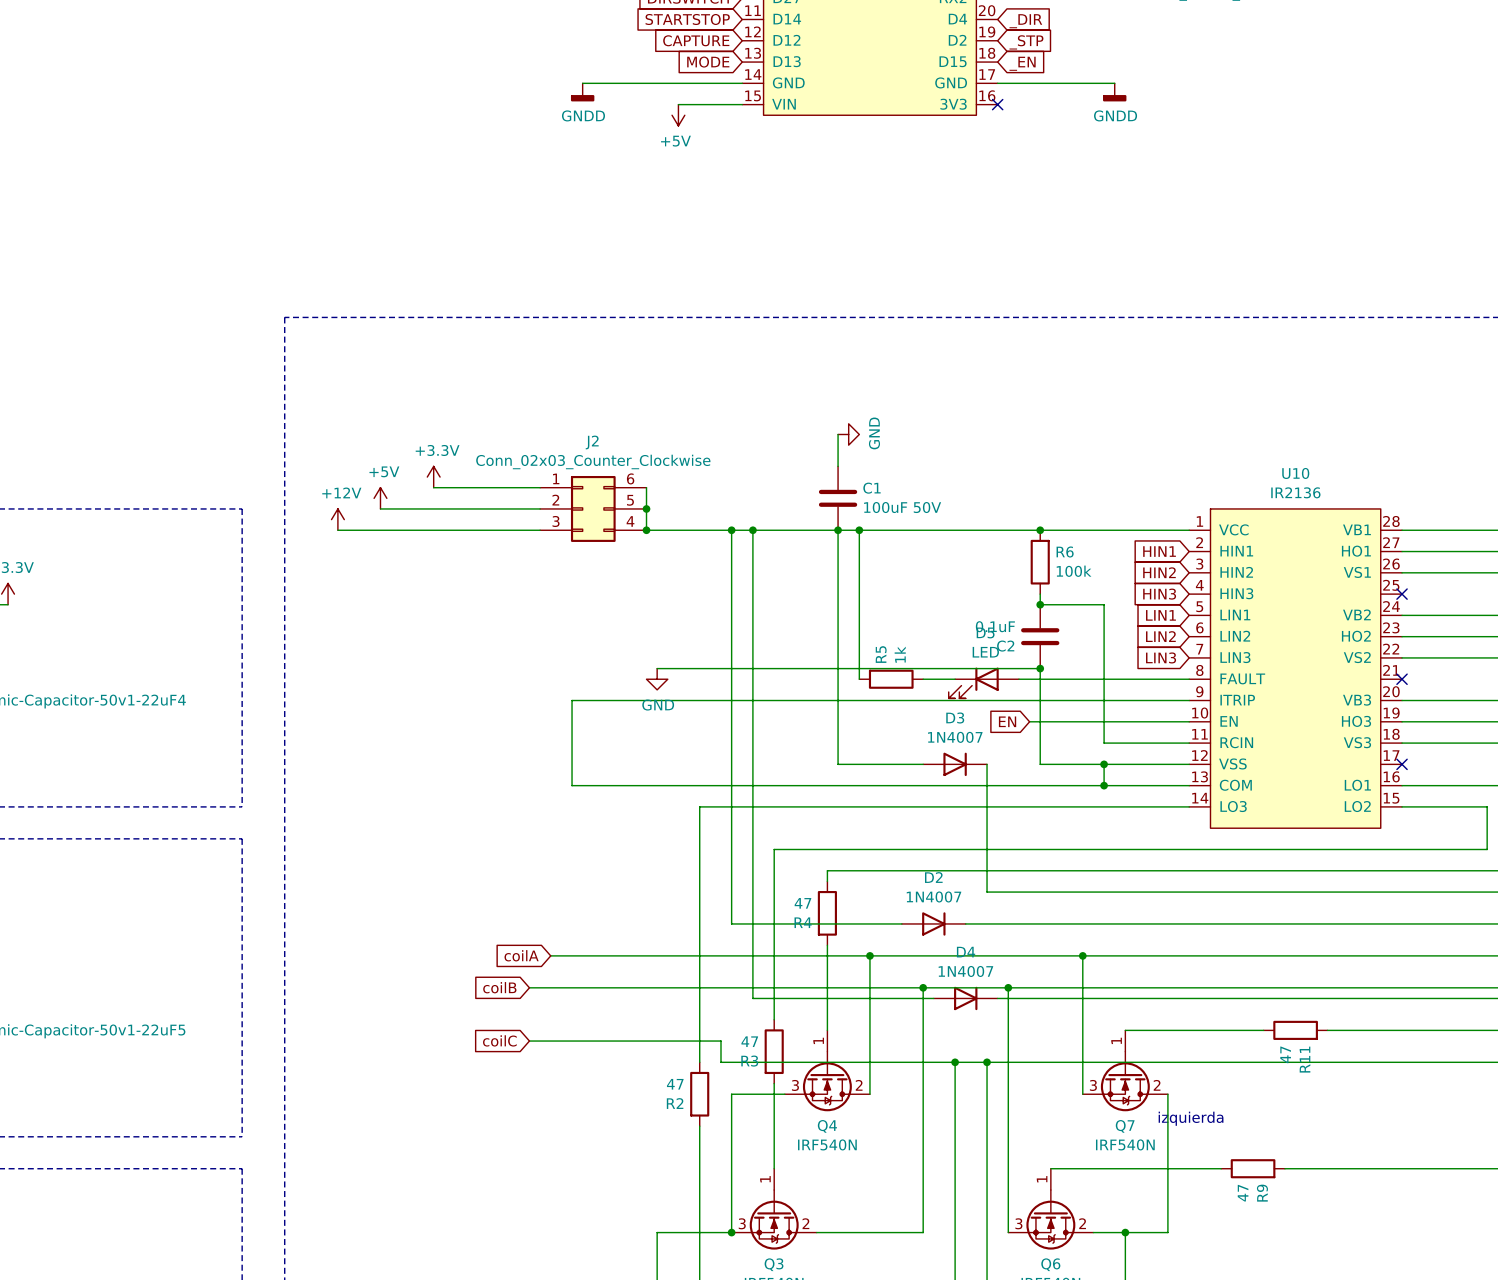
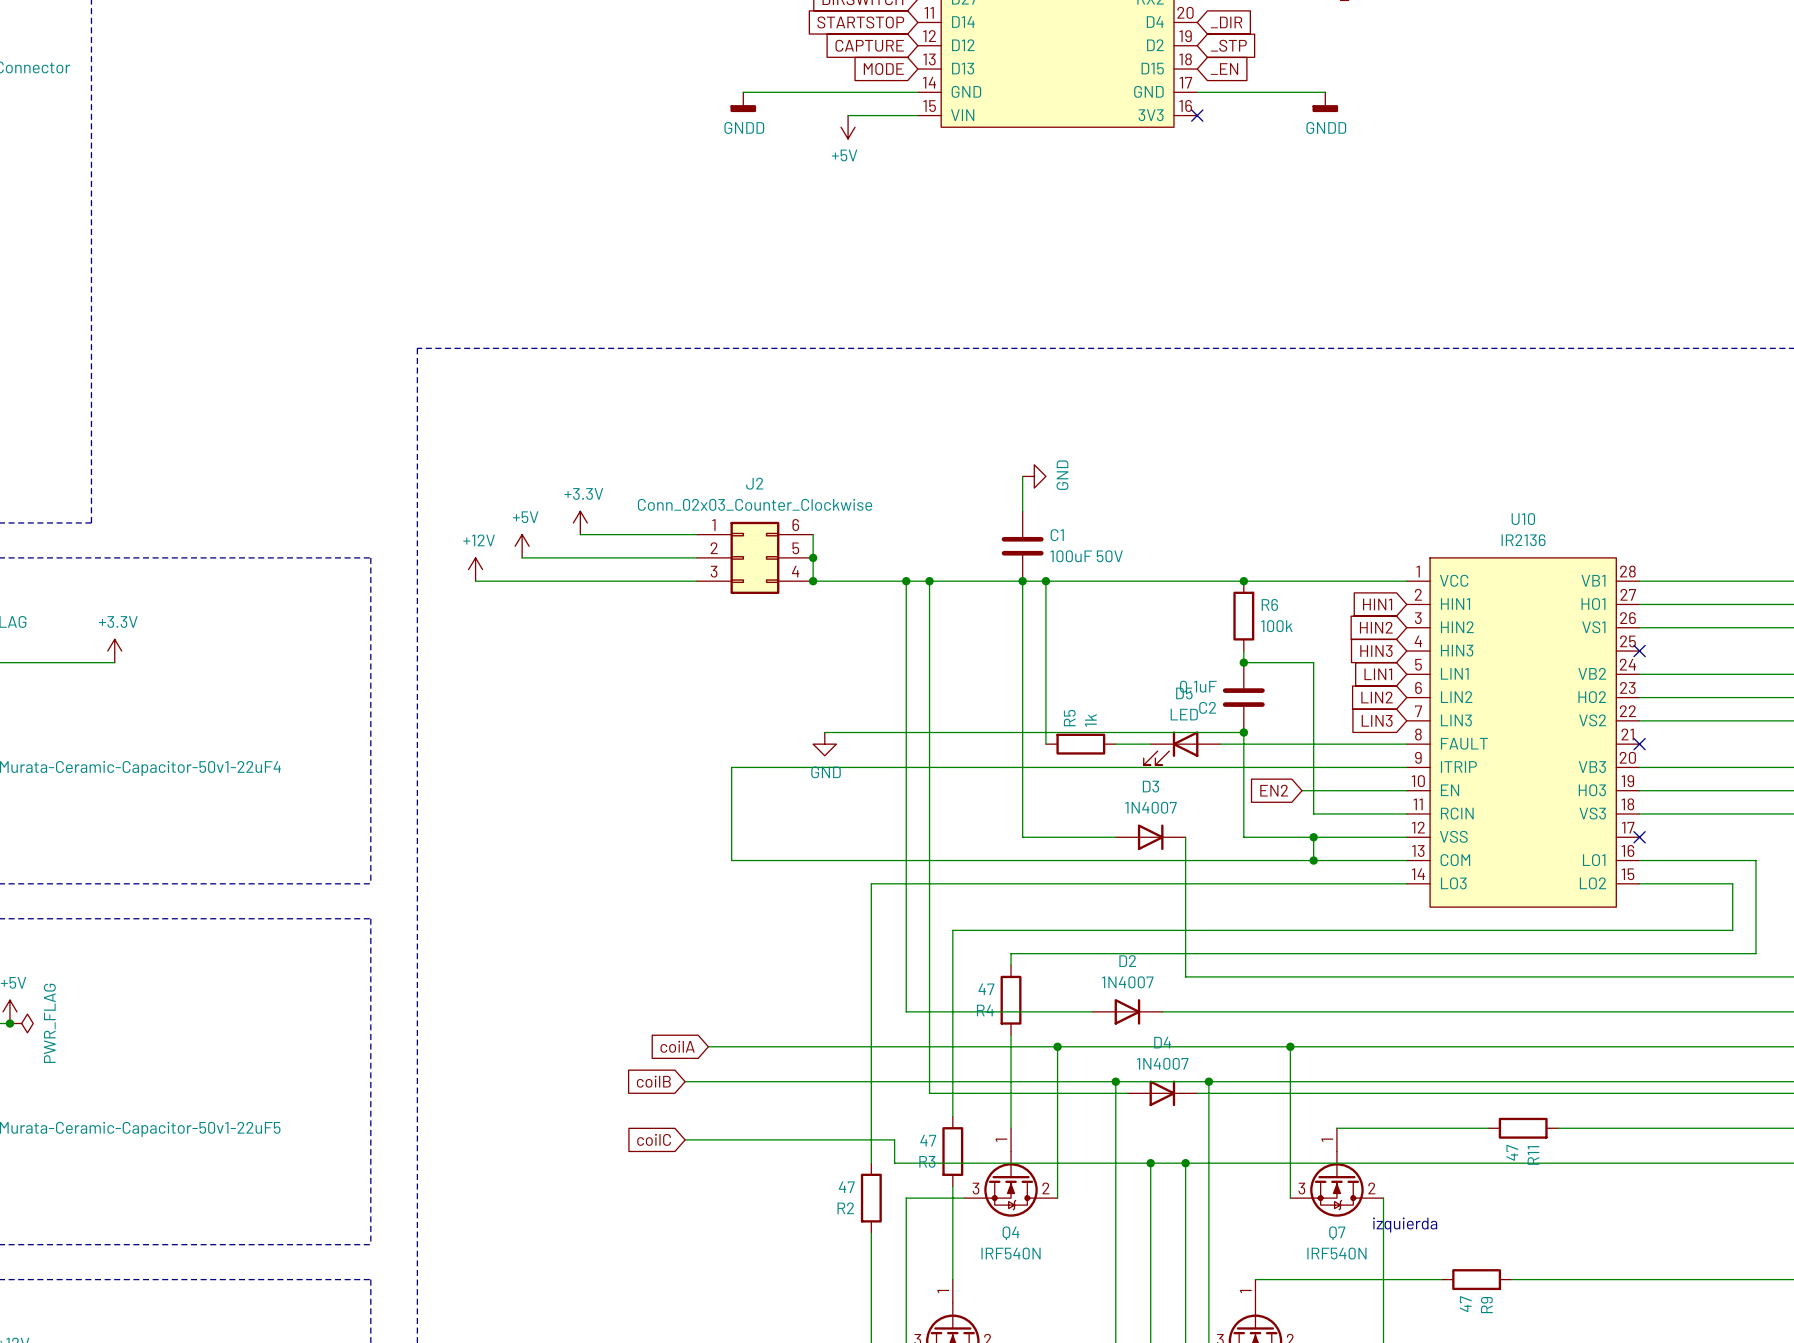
global label: EN (1007, 721) -> none
wire: (1029, 721) (1093, 721) -> none
global label: none -> EN2 (1274, 790)

